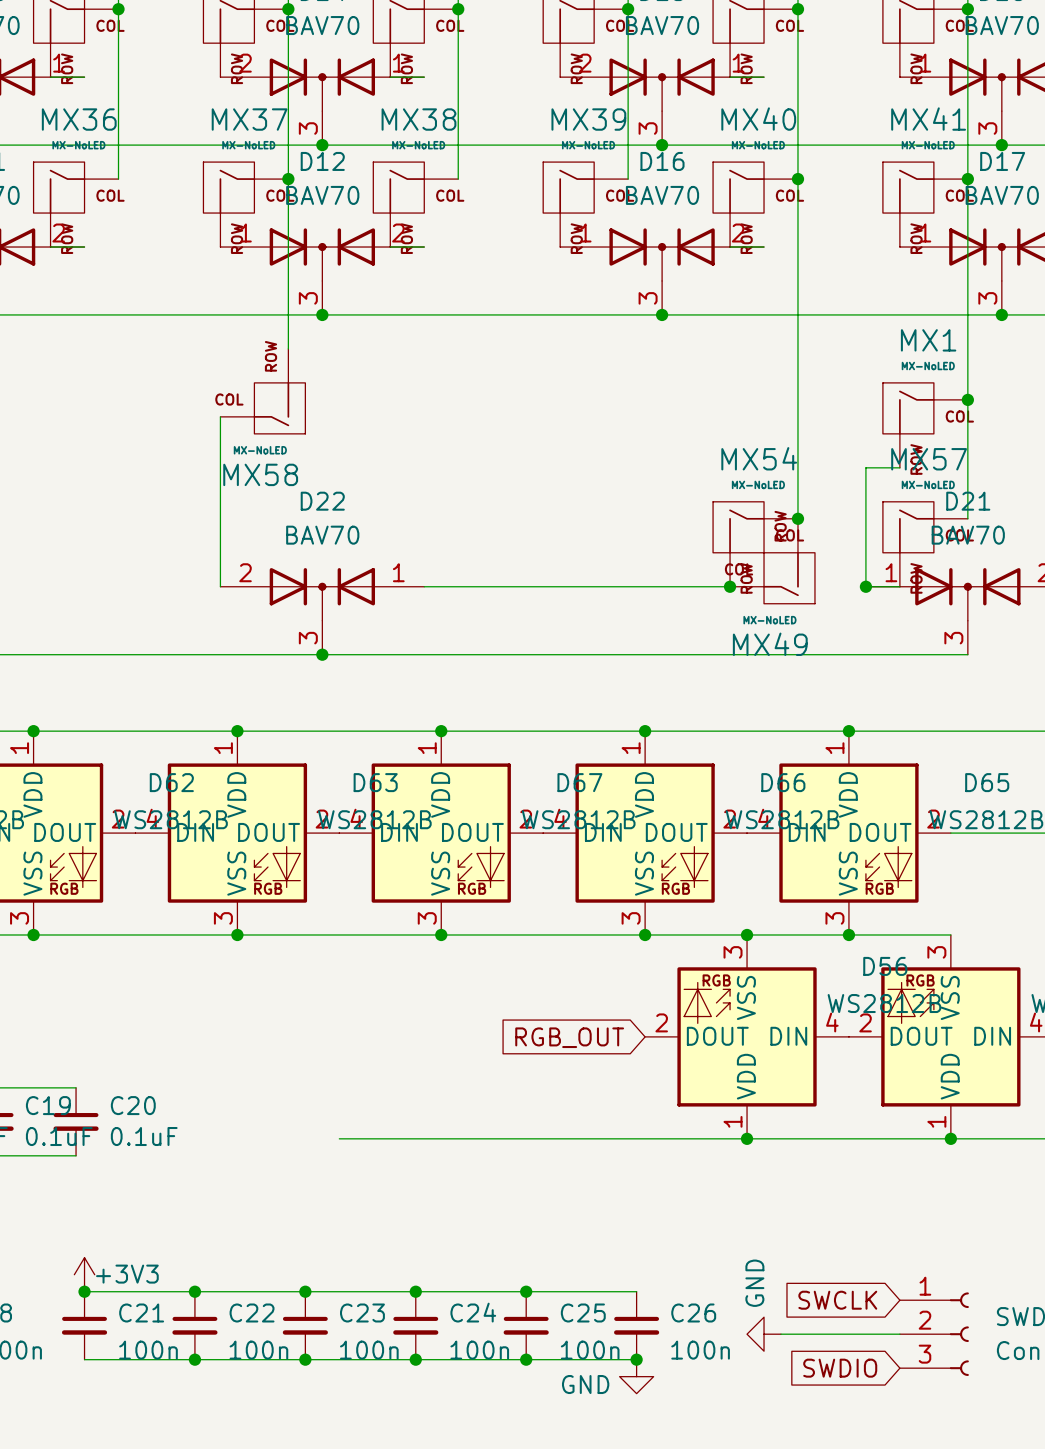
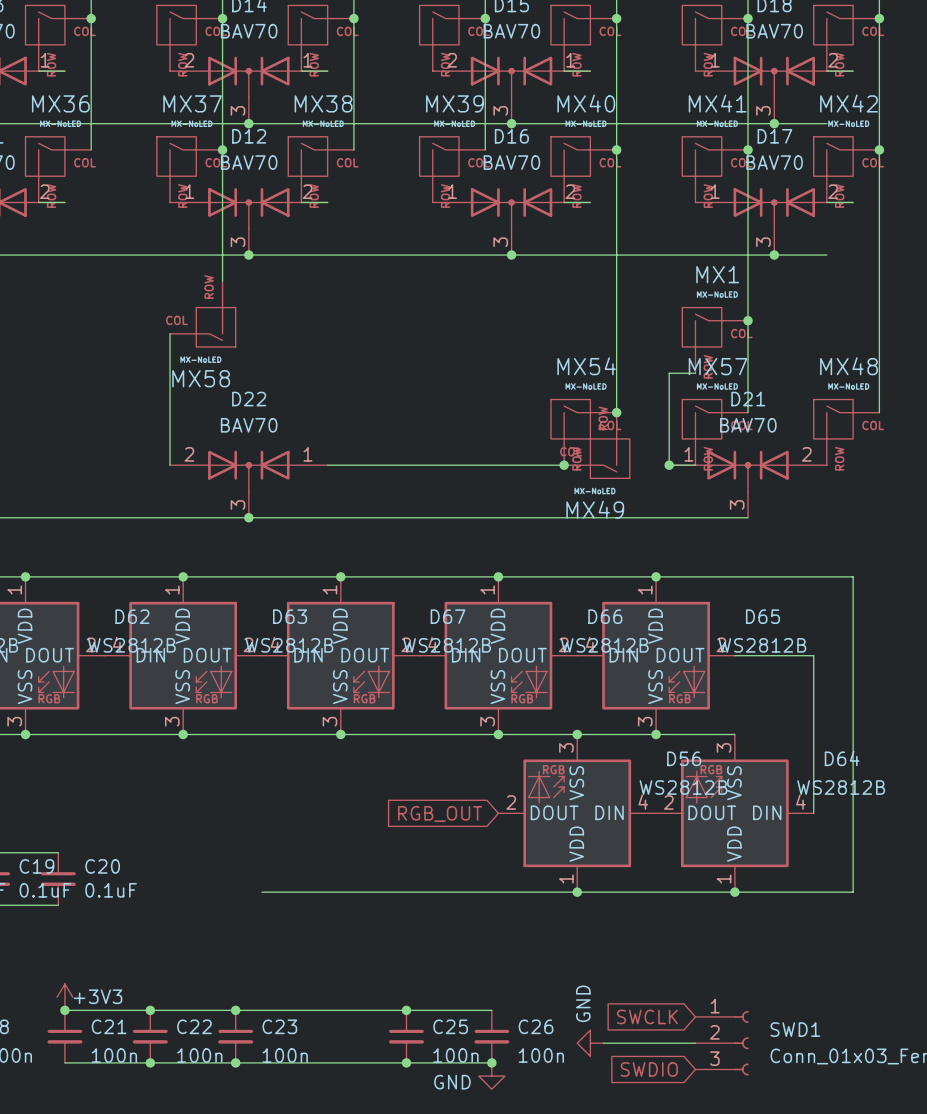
junction: (415, 1291) -> none
C24: 100n (415, 1325) -> none
junction: (415, 1359) -> none

